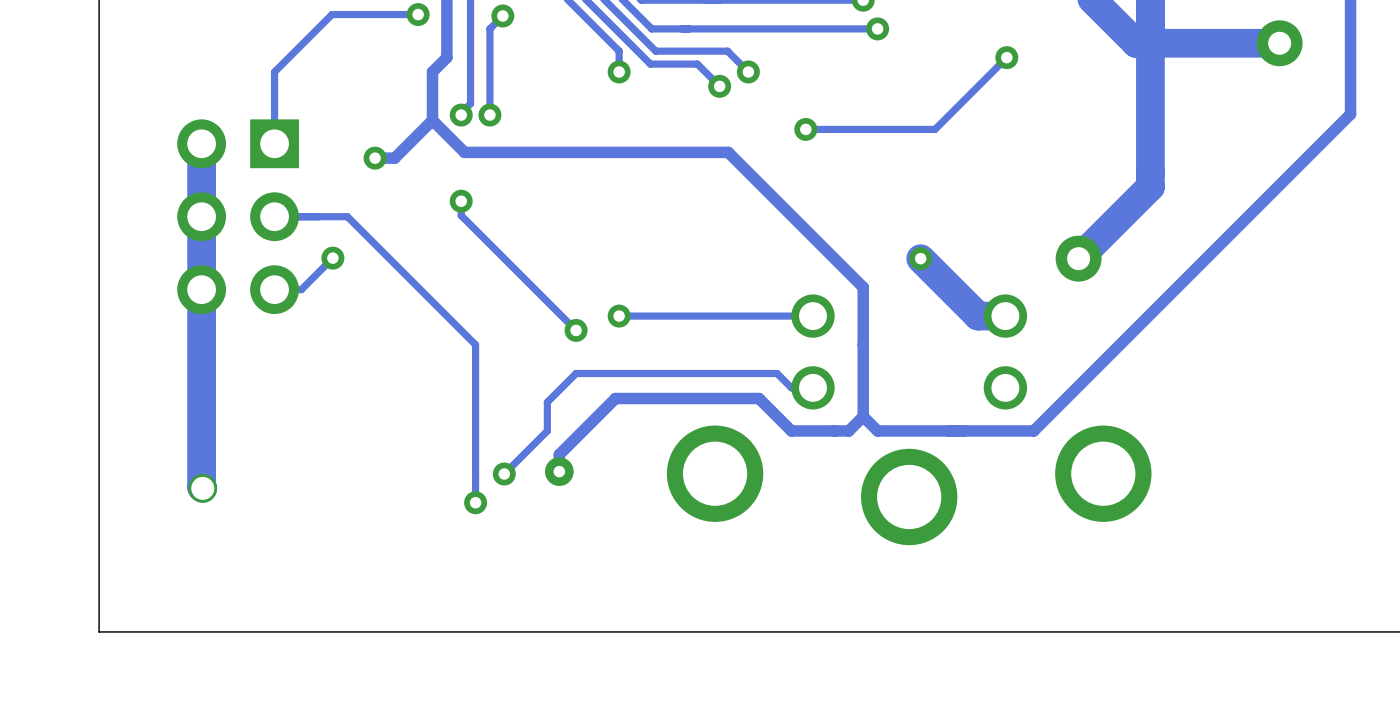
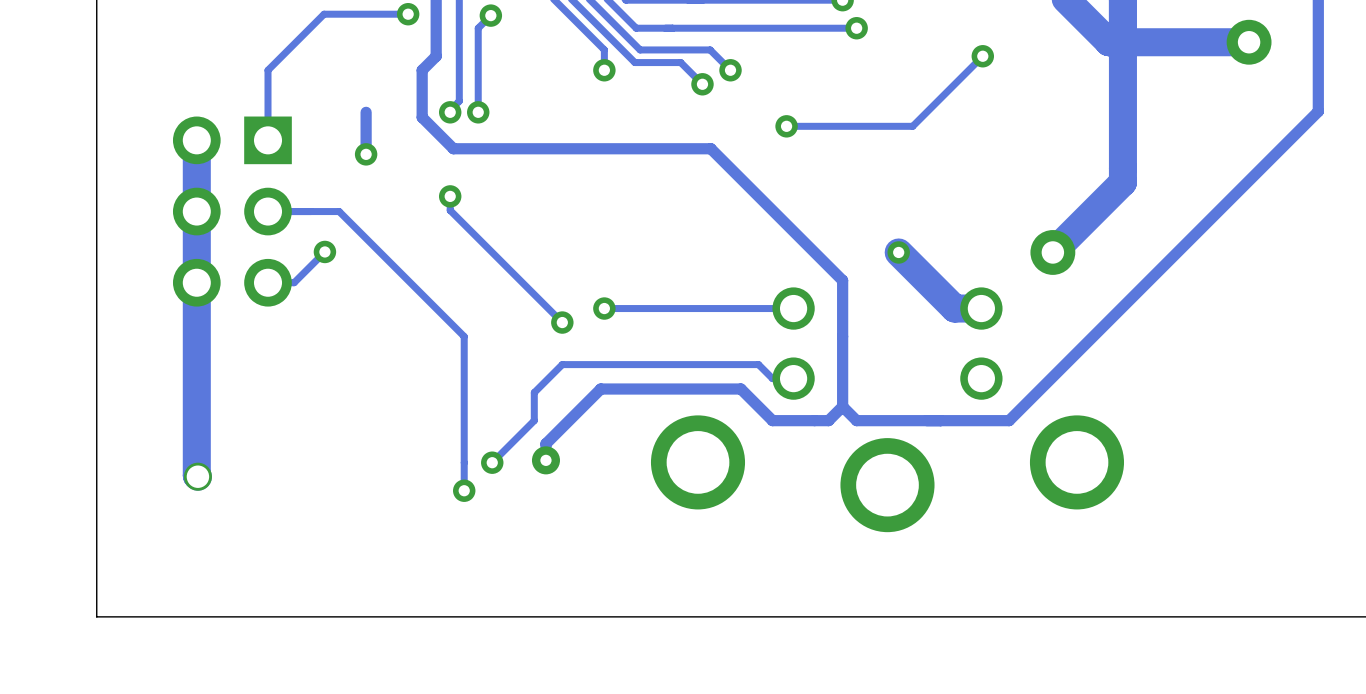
track: (432, 120) (394, 158) (375, 158) -> (366, 112) (366, 154)

